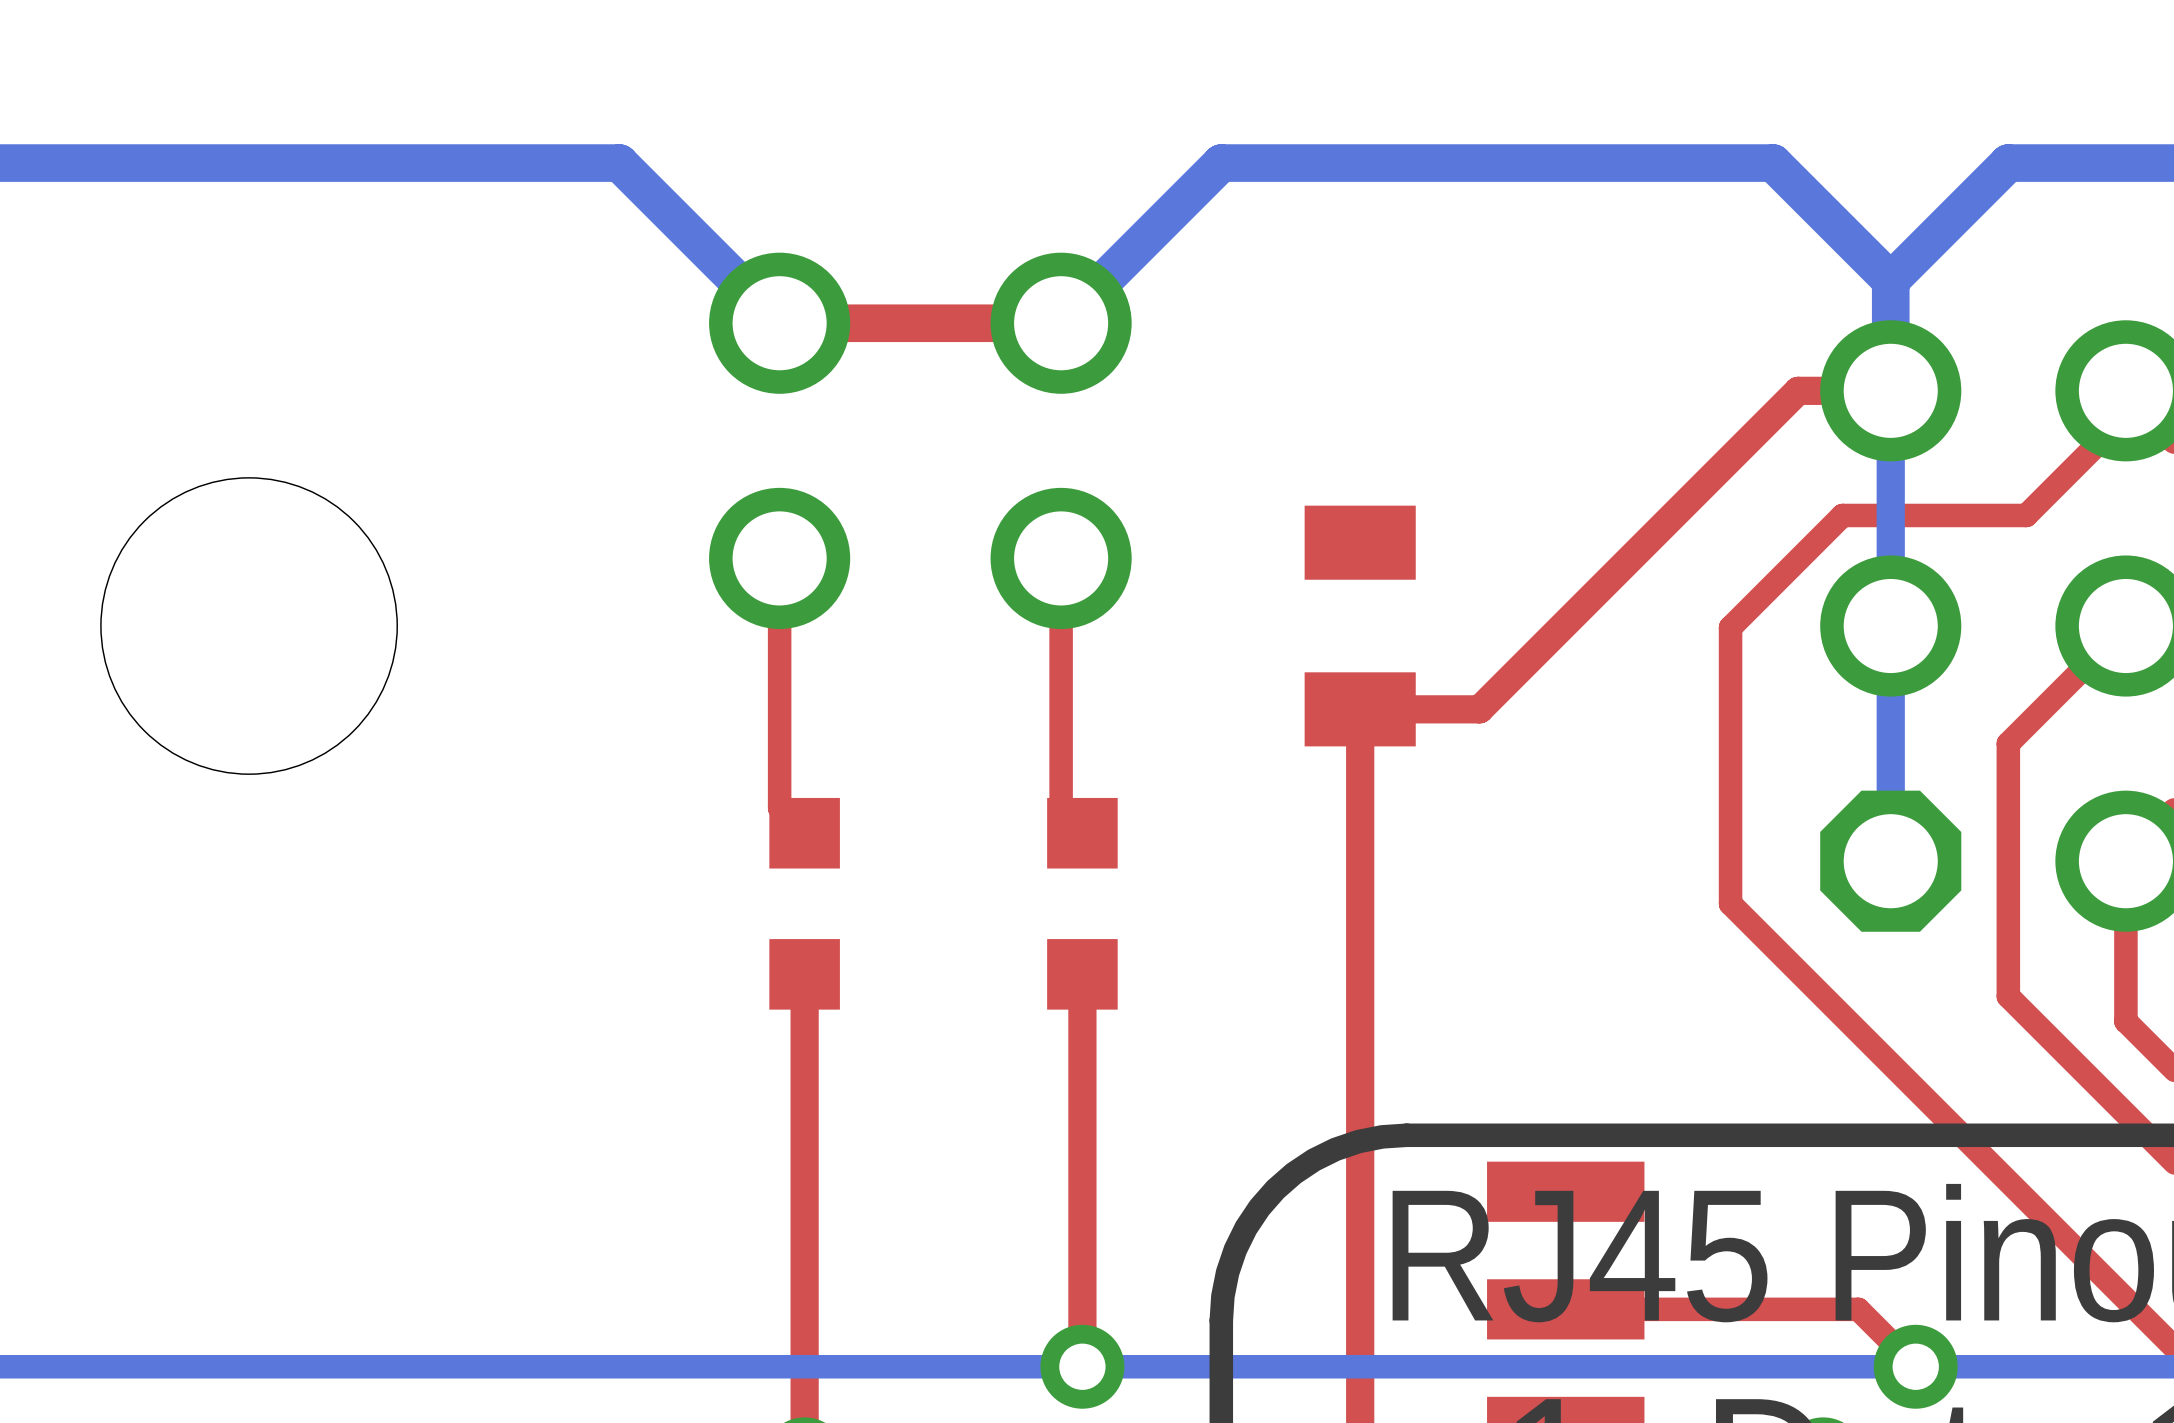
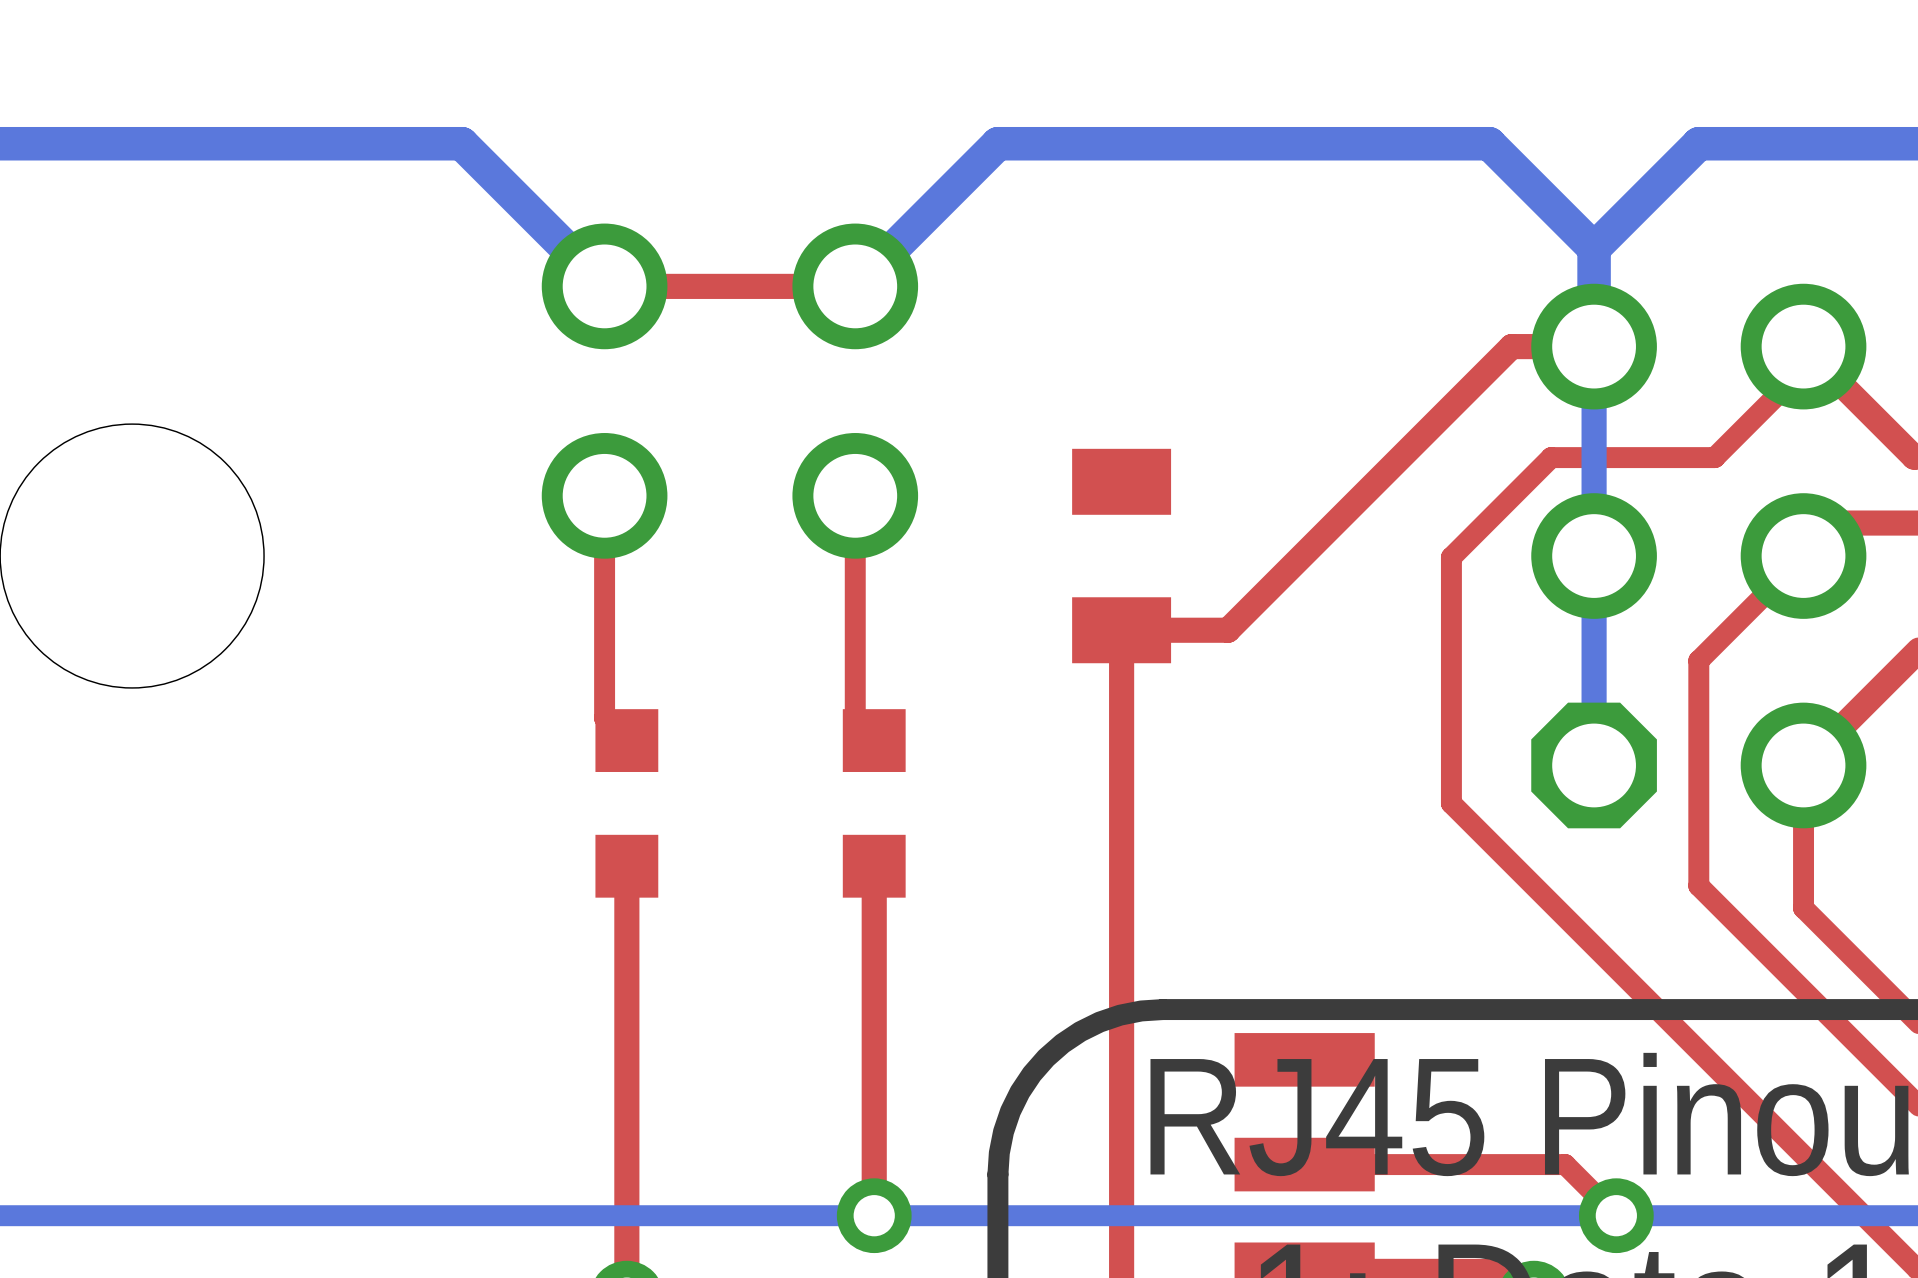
top track width: thick (1061, 323) (779, 323) -> thin (855, 286) (604, 286)

